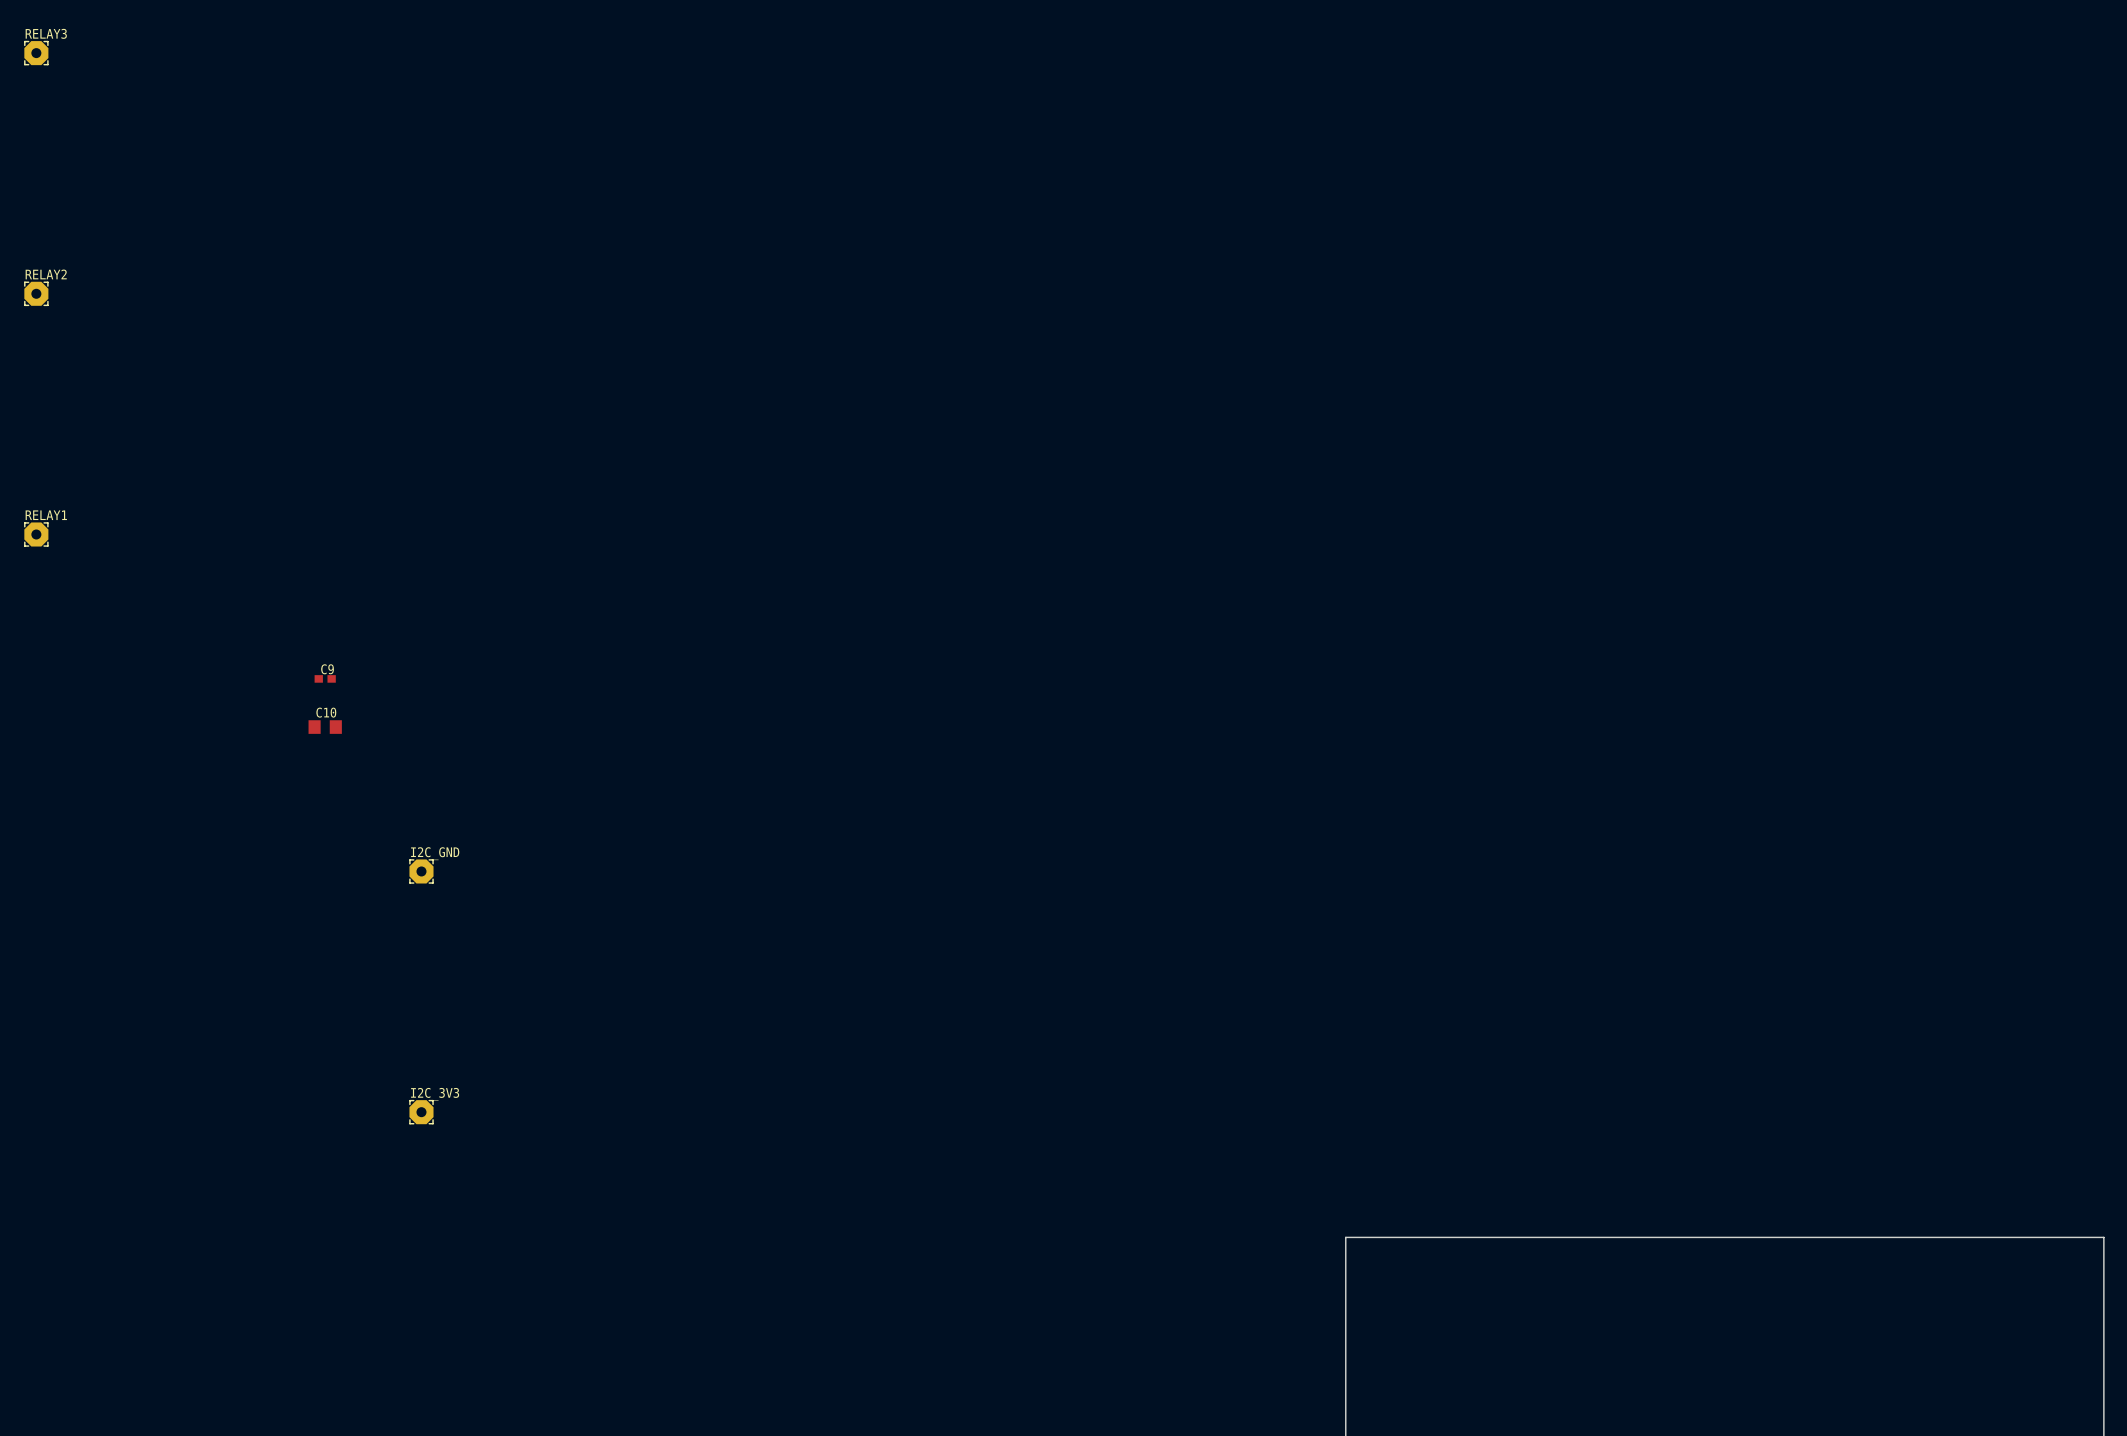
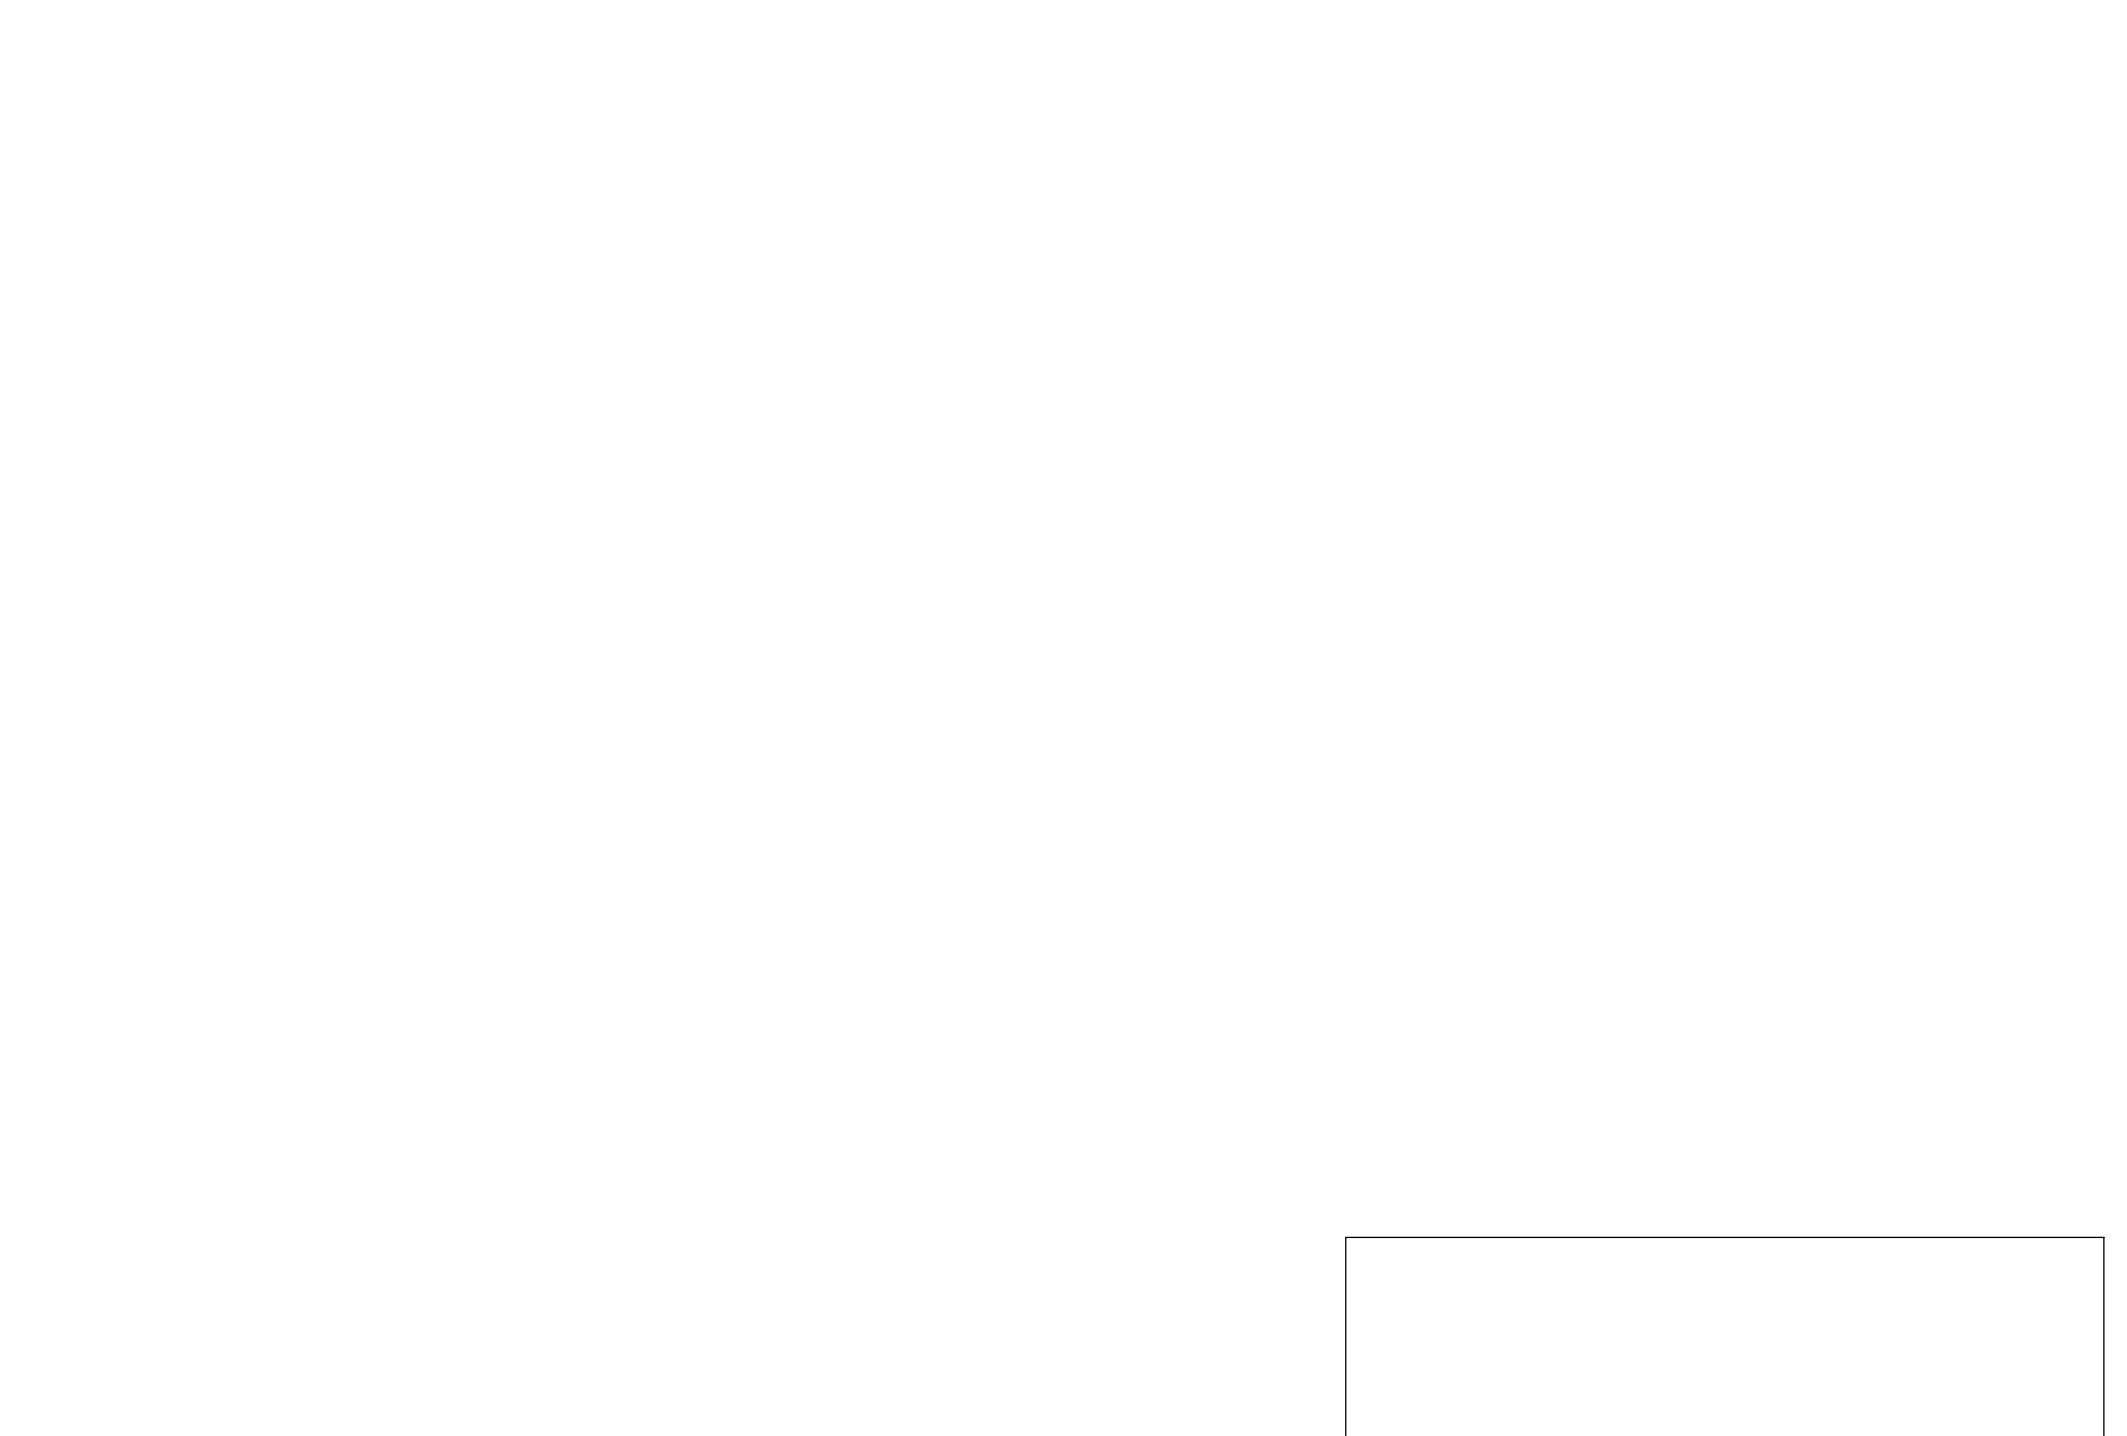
RELAY3: (36, 53) -> none
RELAY2: (36, 293) -> none
RELAY1: (36, 534) -> none
C9: (325, 678) -> none
C10: (325, 727) -> none
I2C_GND: (421, 871) -> none
I2C_3V3: (421, 1112) -> none

